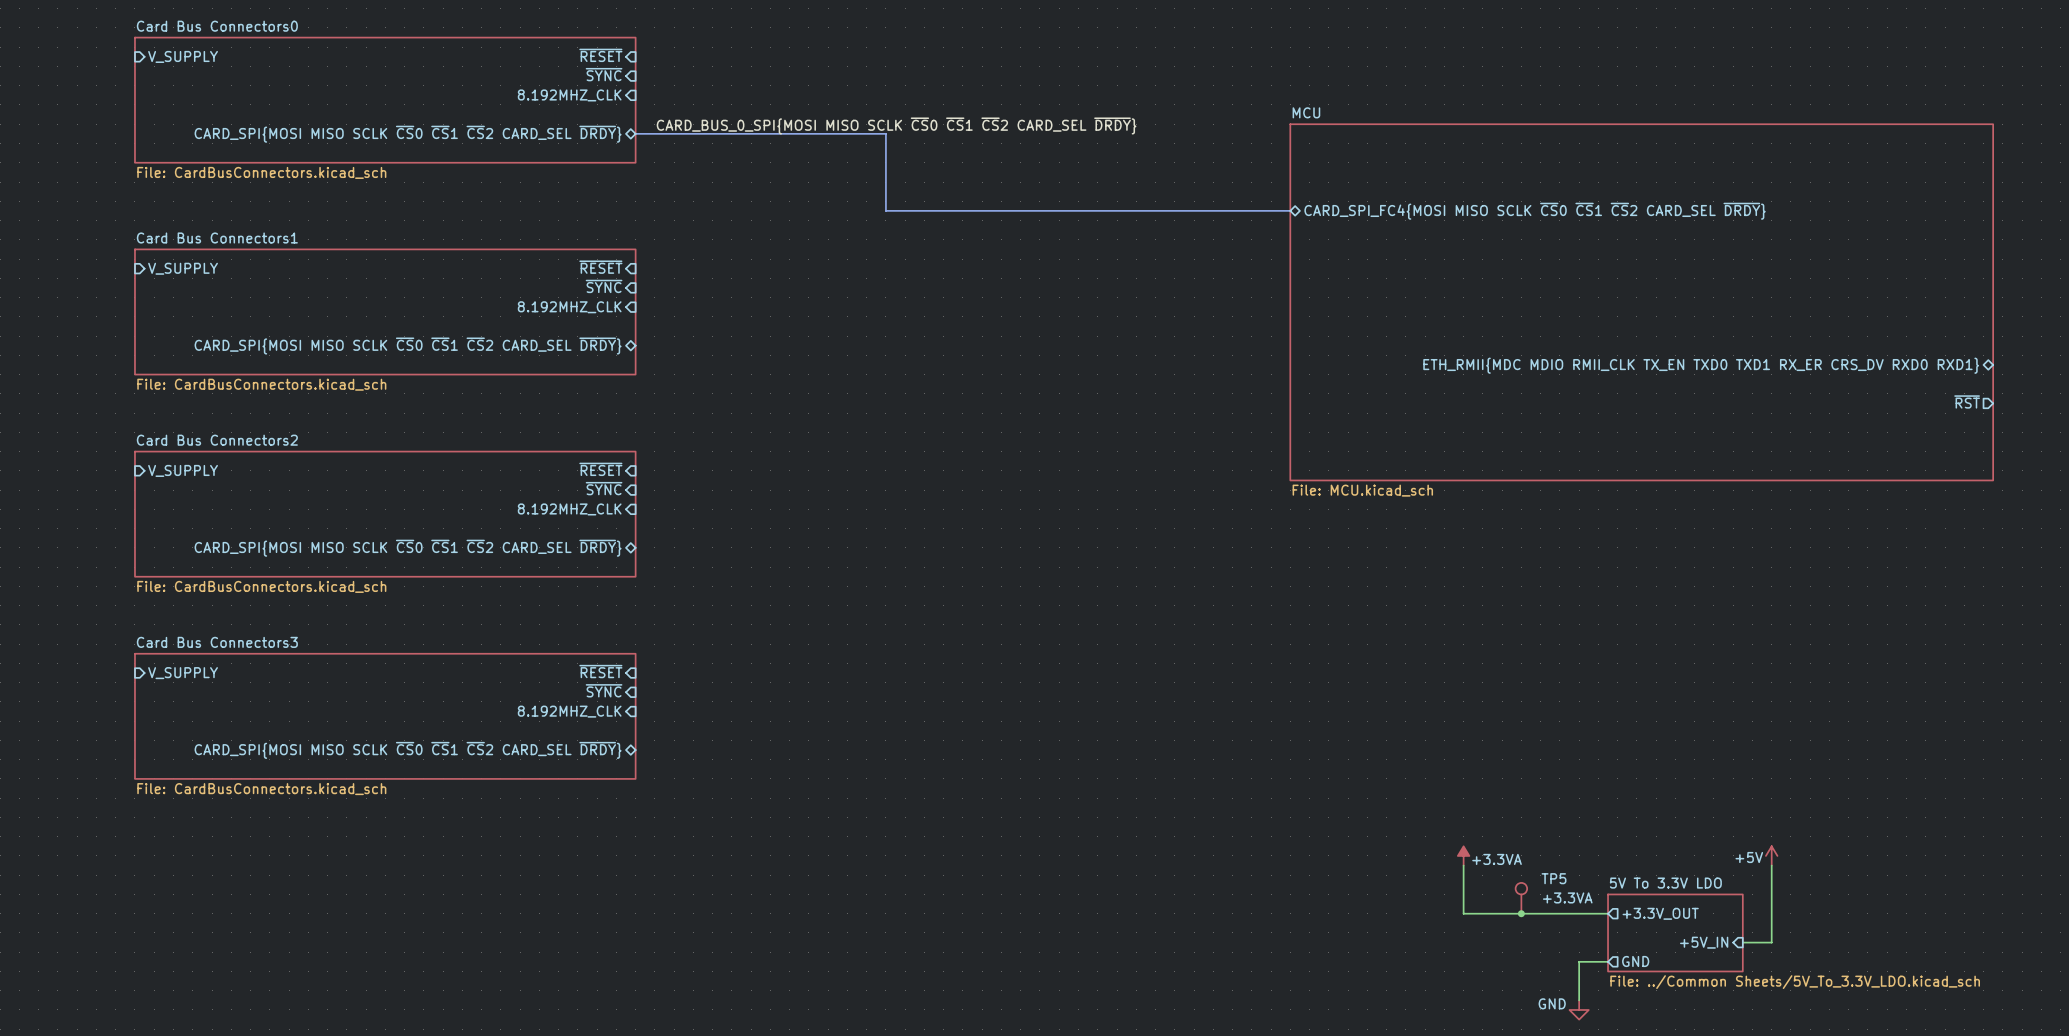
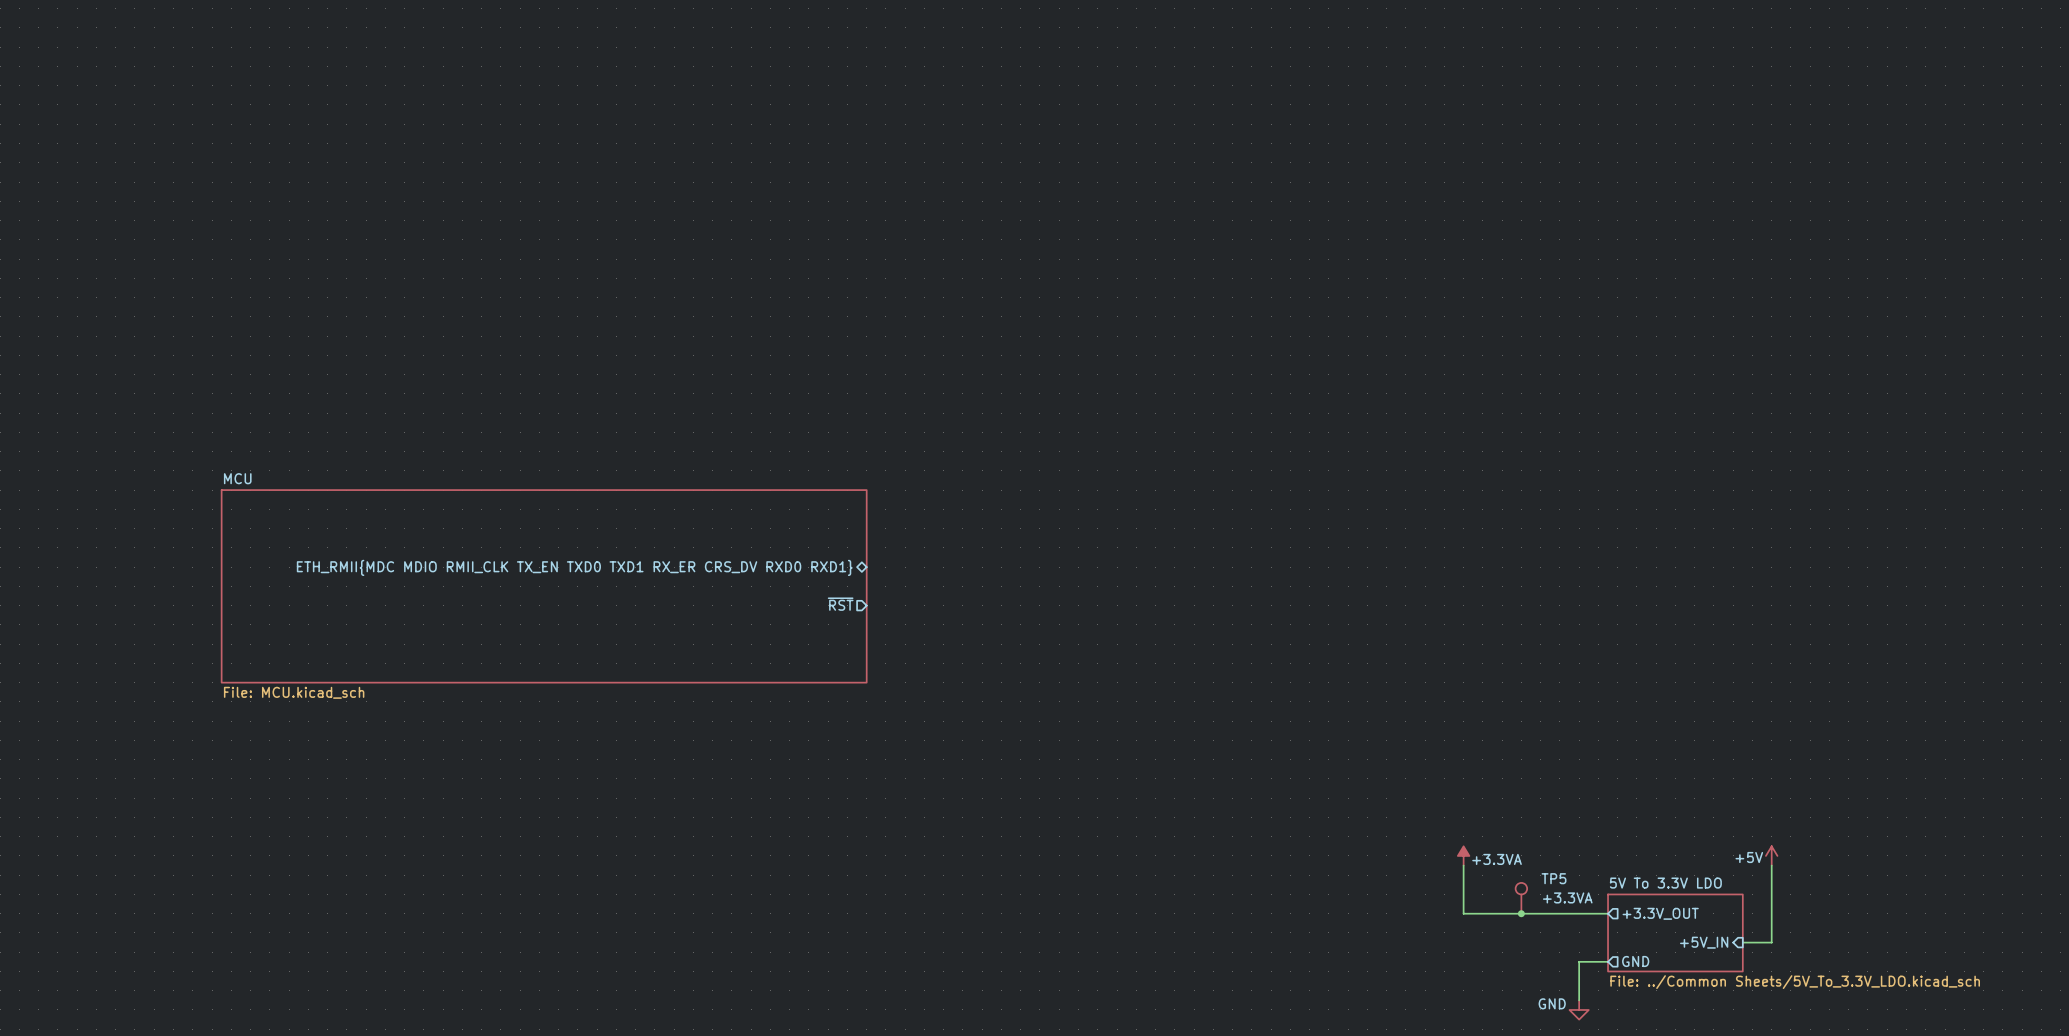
sheet pin: ~{RESET} (600, 55) -> none
sheet pin: V_SUPPLY (183, 56) -> none
sheet pin: ~{SYNC} (604, 74) -> none
sheet pin: 8.192MHZ_CLK (569, 95) -> none
sheet Card Bus Connectors0: File: CardBusConnectors.kicad_sch (385, 100) -> none
label: CARD_BUS_0_SPI{MOSI MISO SCLK ~{CS}0 ~{CS}1 ~{CS}2 CARD_SEL ~{DRDY}} (896, 125) -> none
bus: (635, 133) (885, 133) (885, 210) (1290, 210) -> none
sheet pin: CARD_SPI{MOSI MISO SCLK ~{CS}0 ~{CS}1 ~{CS}2 CARD_SEL ~{DRDY}} (408, 134) -> none
sheet pin: CARD_SPI_FC4{MOSI MISO SCLK ~{CS}0 ~{CS}1 ~{CS}2 CARD_SEL ~{DRDY}} (1535, 211) -> none
sheet pin: ~{RESET} (600, 267) -> none
sheet pin: V_SUPPLY (183, 268) -> none
sheet pin: ~{SYNC} (604, 286) -> none
sheet MCU: File: MCU.kicad_sch (1641, 302) -> none
sheet pin: 8.192MHZ_CLK (569, 307) -> none
sheet Card Bus Connectors1: File: CardBusConnectors.kicad_sch (385, 311) -> none
sheet pin: CARD_SPI{MOSI MISO SCLK ~{CS}0 ~{CS}1 ~{CS}2 CARD_SEL ~{DRDY}} (408, 346) -> none
sheet pin: ETH_RMII{MDC MDIO RMII_CLK TX_EN TXD0 TXD1 RX_ER CRS_DV RXD0 RXD1} (1701, 365) -> none
sheet pin: ~{RST} (1967, 401) -> none
sheet pin: ~{RESET} (600, 469) -> none
sheet pin: V_SUPPLY (183, 470) -> none
sheet pin: ~{SYNC} (604, 488) -> none
sheet pin: 8.192MHZ_CLK (569, 509) -> none
sheet Card Bus Connectors2: File: CardBusConnectors.kicad_sch (385, 514) -> none
sheet pin: CARD_SPI{MOSI MISO SCLK ~{CS}0 ~{CS}1 ~{CS}2 CARD_SEL ~{DRDY}} (408, 548) -> none
sheet pin: none -> ETH_RMII{MDC MDIO RMII_CLK TX_EN TXD0 TXD1 RX_ER CRS_DV RXD0 RXD1} (574, 567)
sheet MCU: none -> File: MCU.kicad_sch (544, 586)
sheet pin: none -> ~{RST} (840, 604)
sheet pin: ~{RESET} (600, 671) -> none
sheet pin: V_SUPPLY (183, 673) -> none
sheet pin: ~{SYNC} (604, 690) -> none
sheet pin: 8.192MHZ_CLK (569, 711) -> none
sheet Card Bus Connectors3: File: CardBusConnectors.kicad_sch (385, 716) -> none
sheet pin: CARD_SPI{MOSI MISO SCLK ~{CS}0 ~{CS}1 ~{CS}2 CARD_SEL ~{DRDY}} (408, 750) -> none

